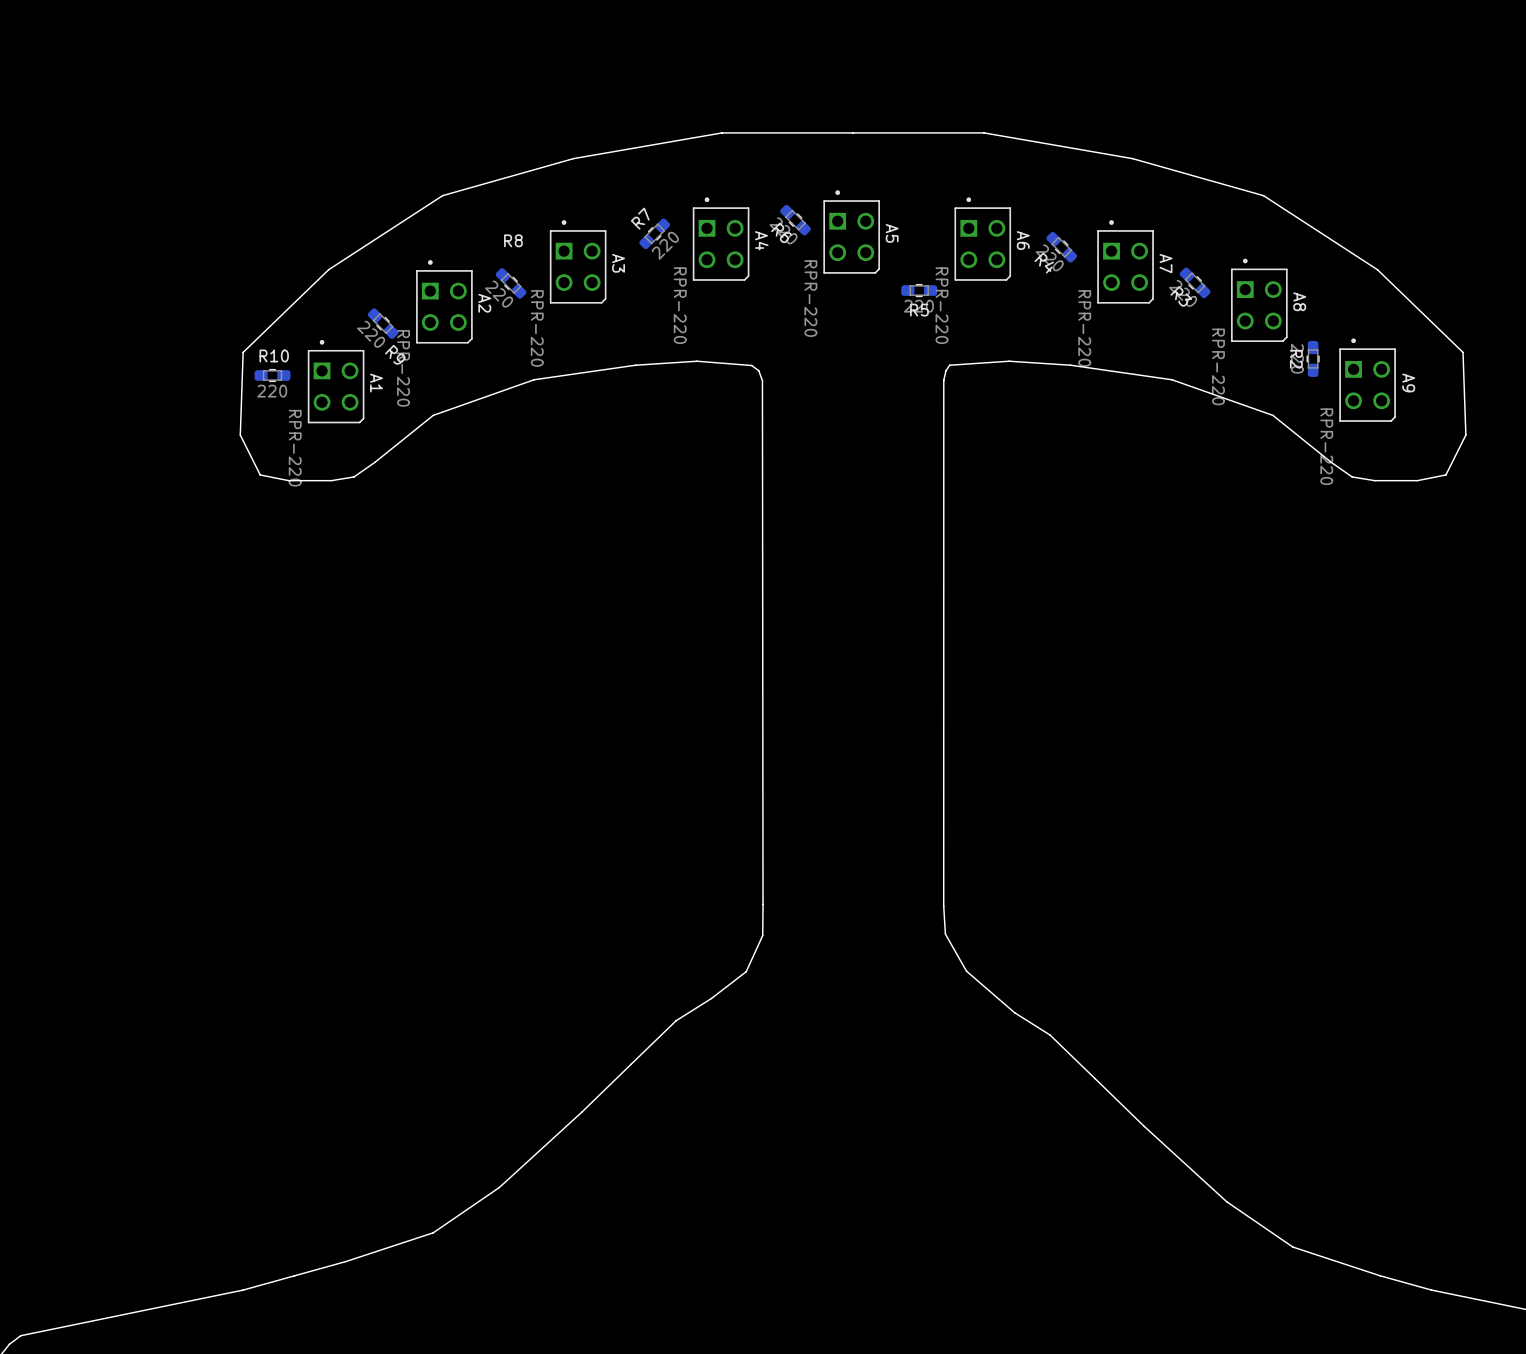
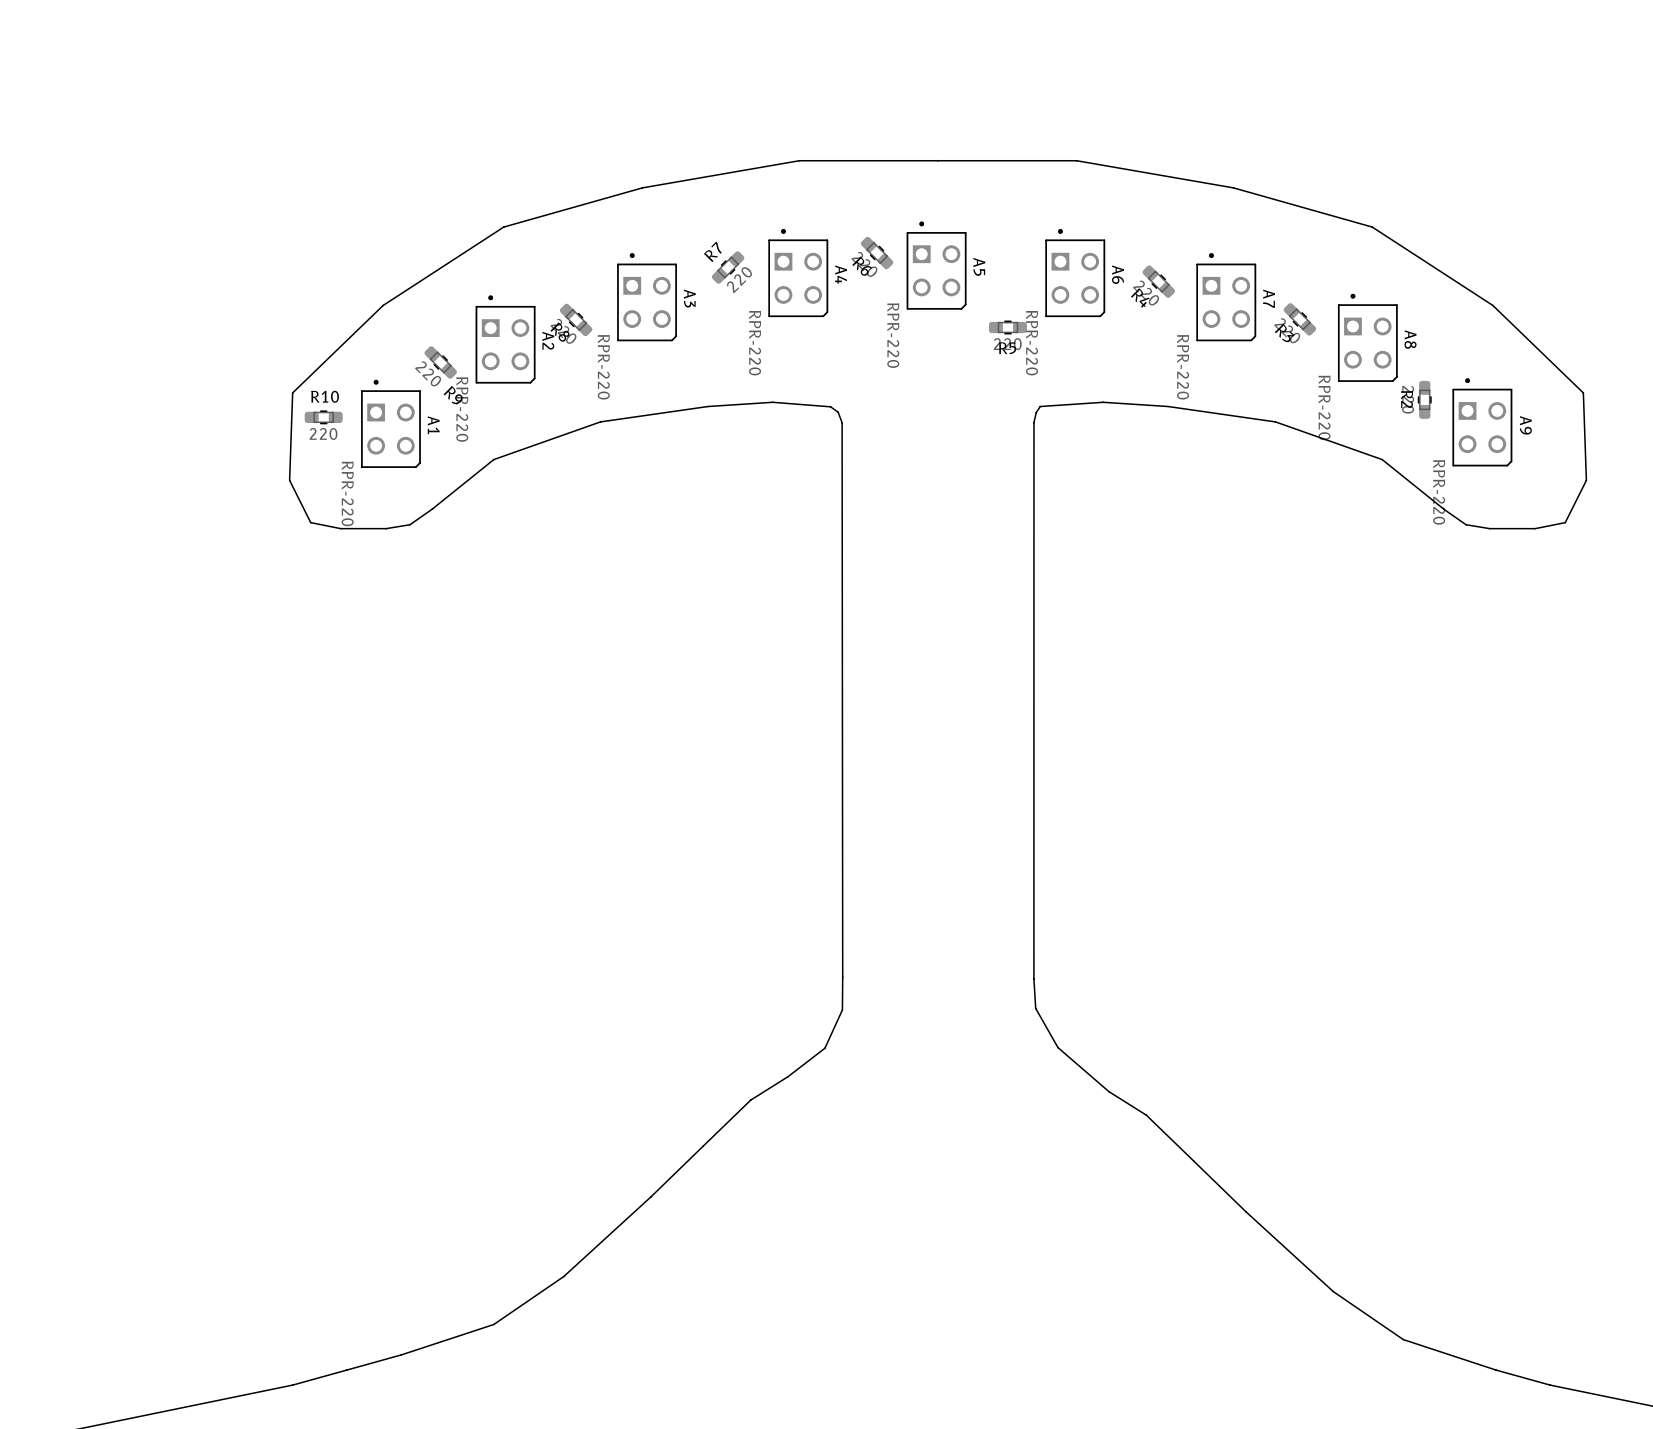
R8 name rotation: 0° (513, 240) -> 45° clockwise (559, 332)
R8 name position: R8 (513, 240) -> R8 (559, 332)

